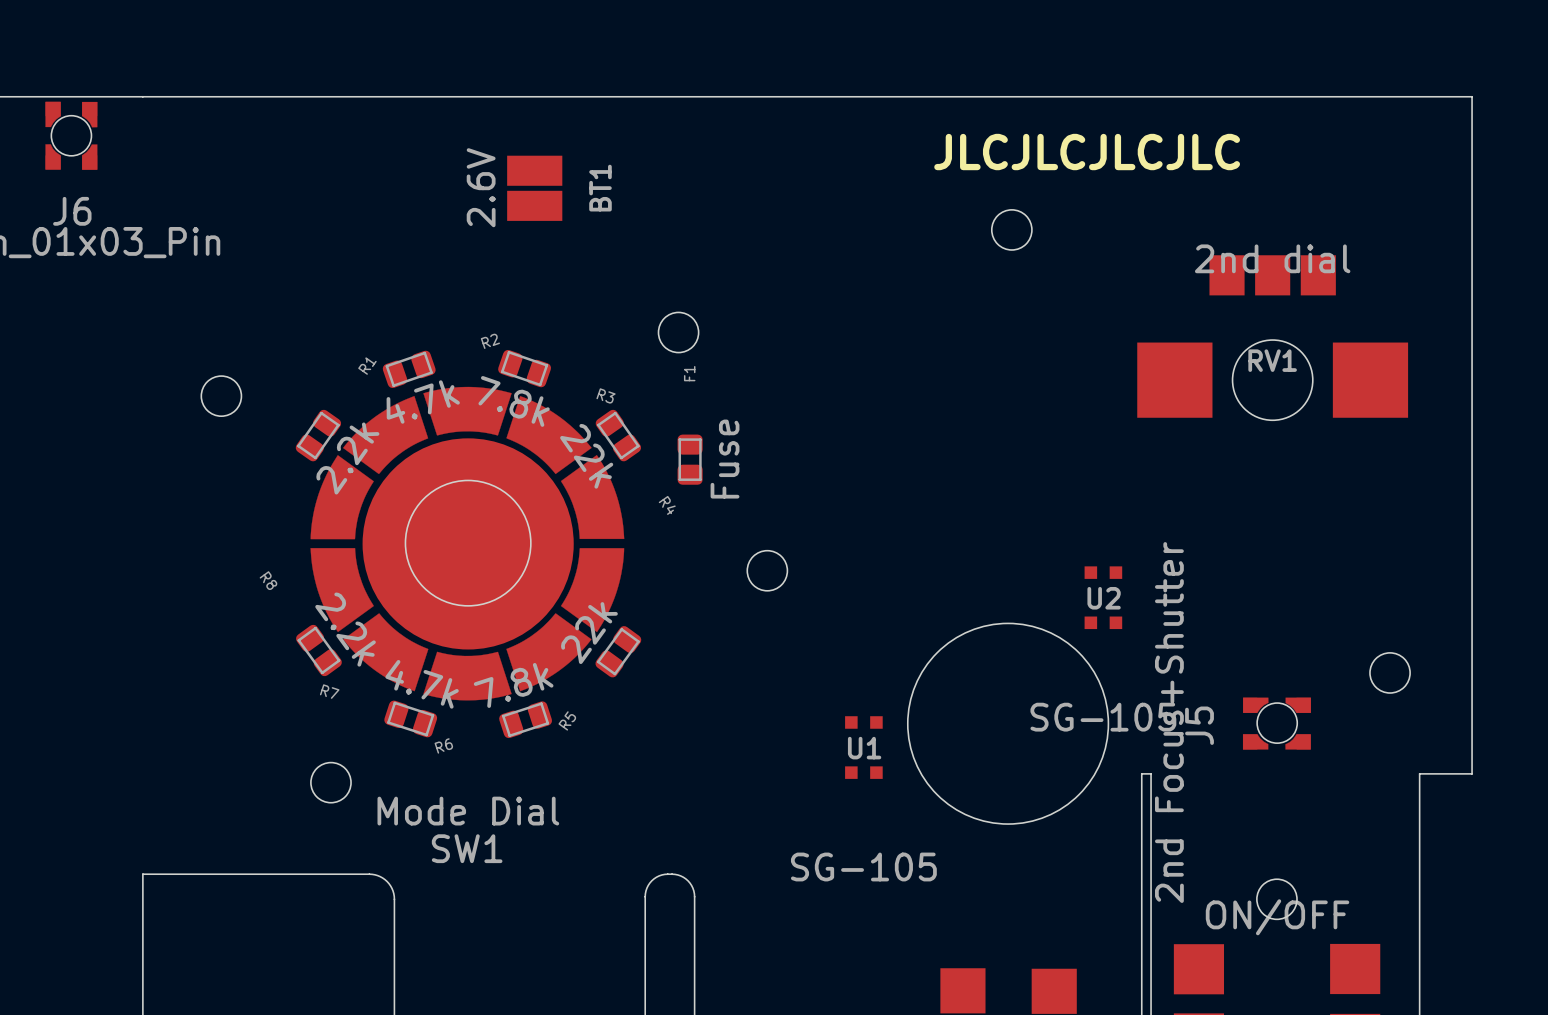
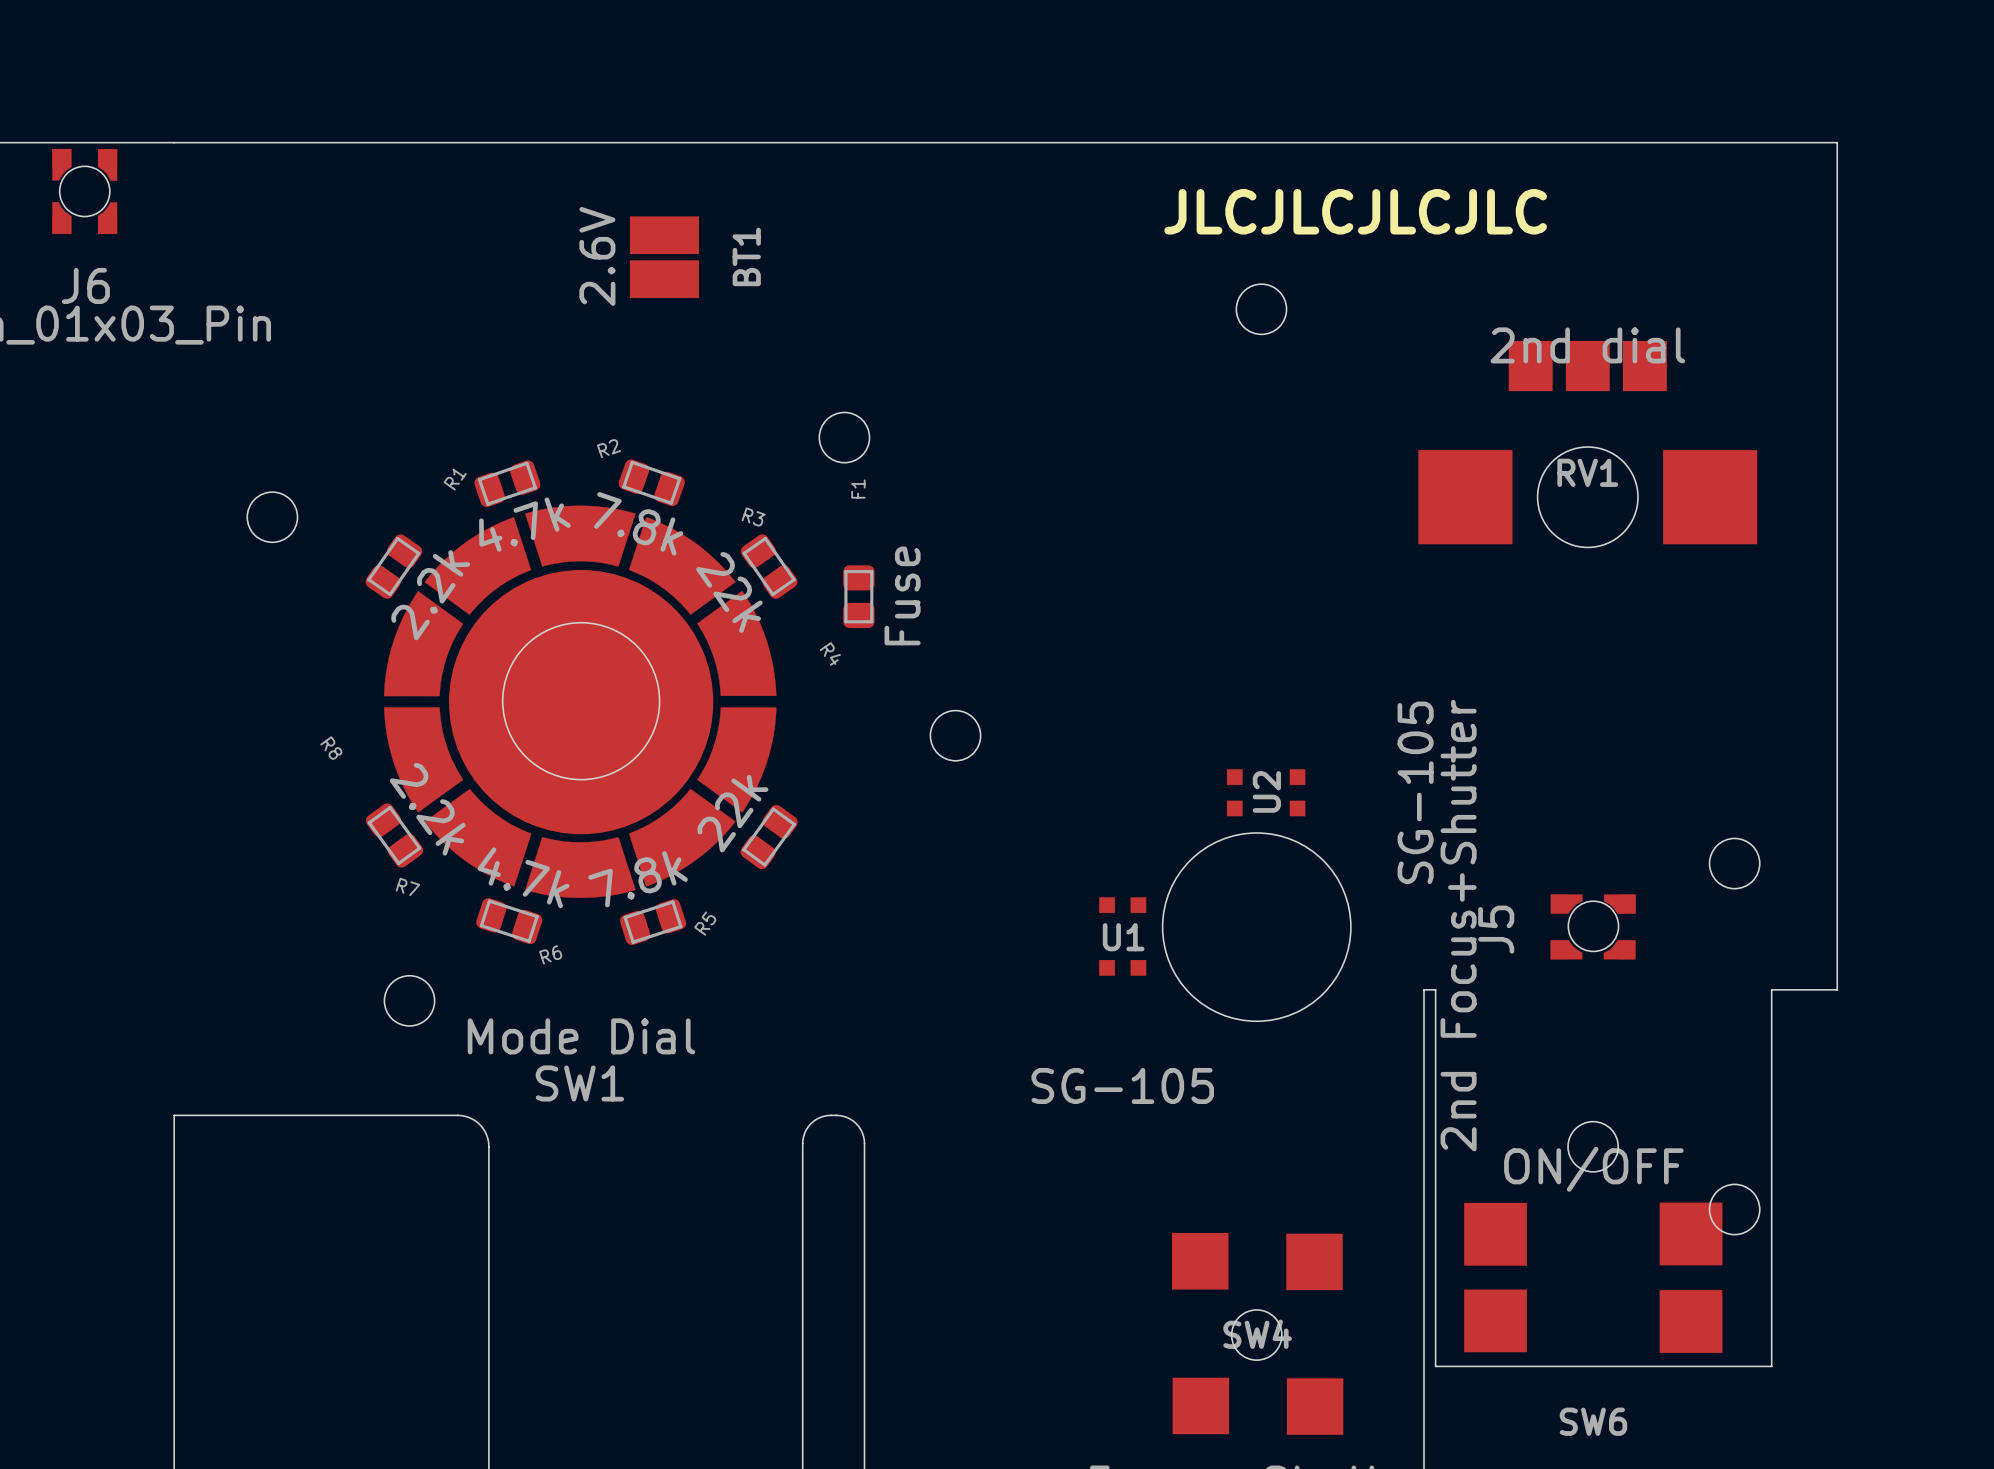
U2 rotation: 0° (1103, 597) -> 90° clockwise (1266, 792)
U2 position: (1103, 597) -> (1266, 792)
round board edge size: [907, 622, 1110, 825] -> [1161, 832, 1352, 1023]
U2 value position: SG-105 (1103, 717) -> SG-105 (1415, 792)
U1 position: (863, 747) -> (1122, 936)
round board edge: none -> [1708, 1183, 1761, 1236]

